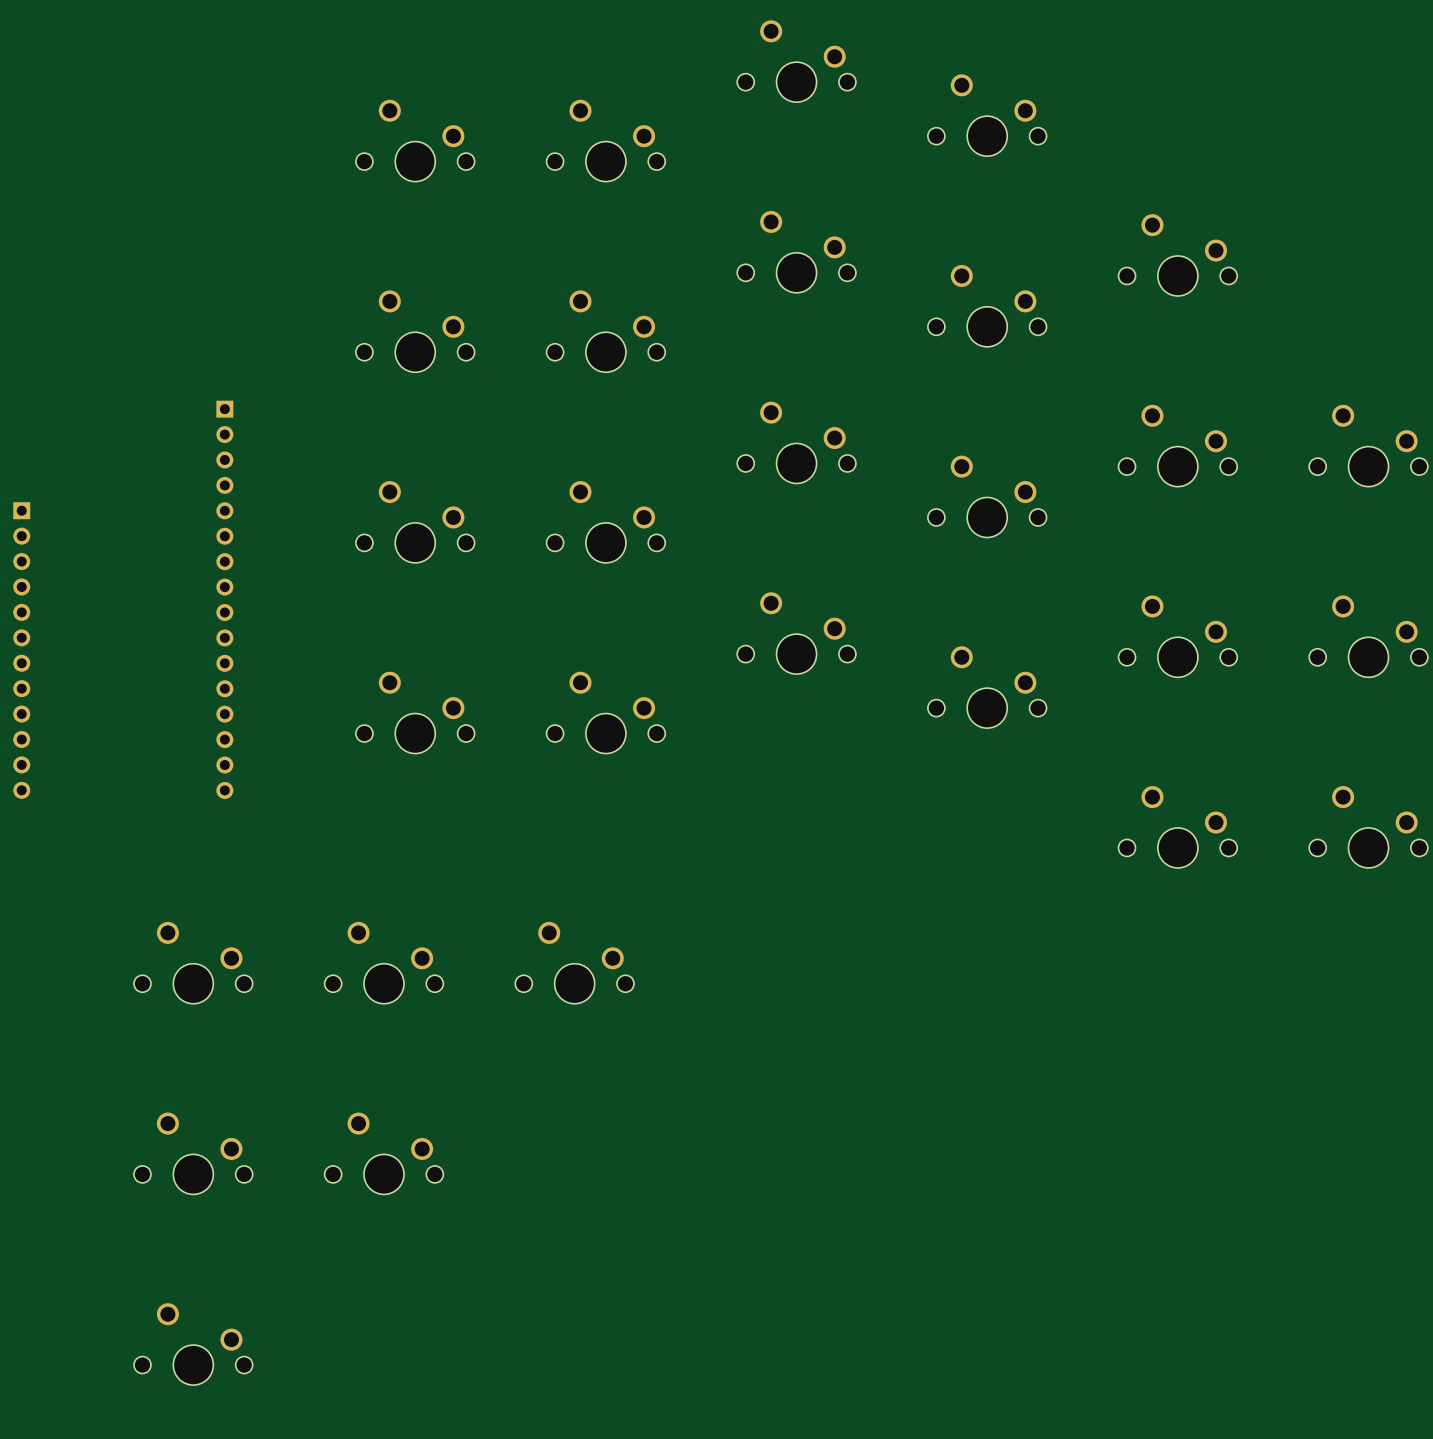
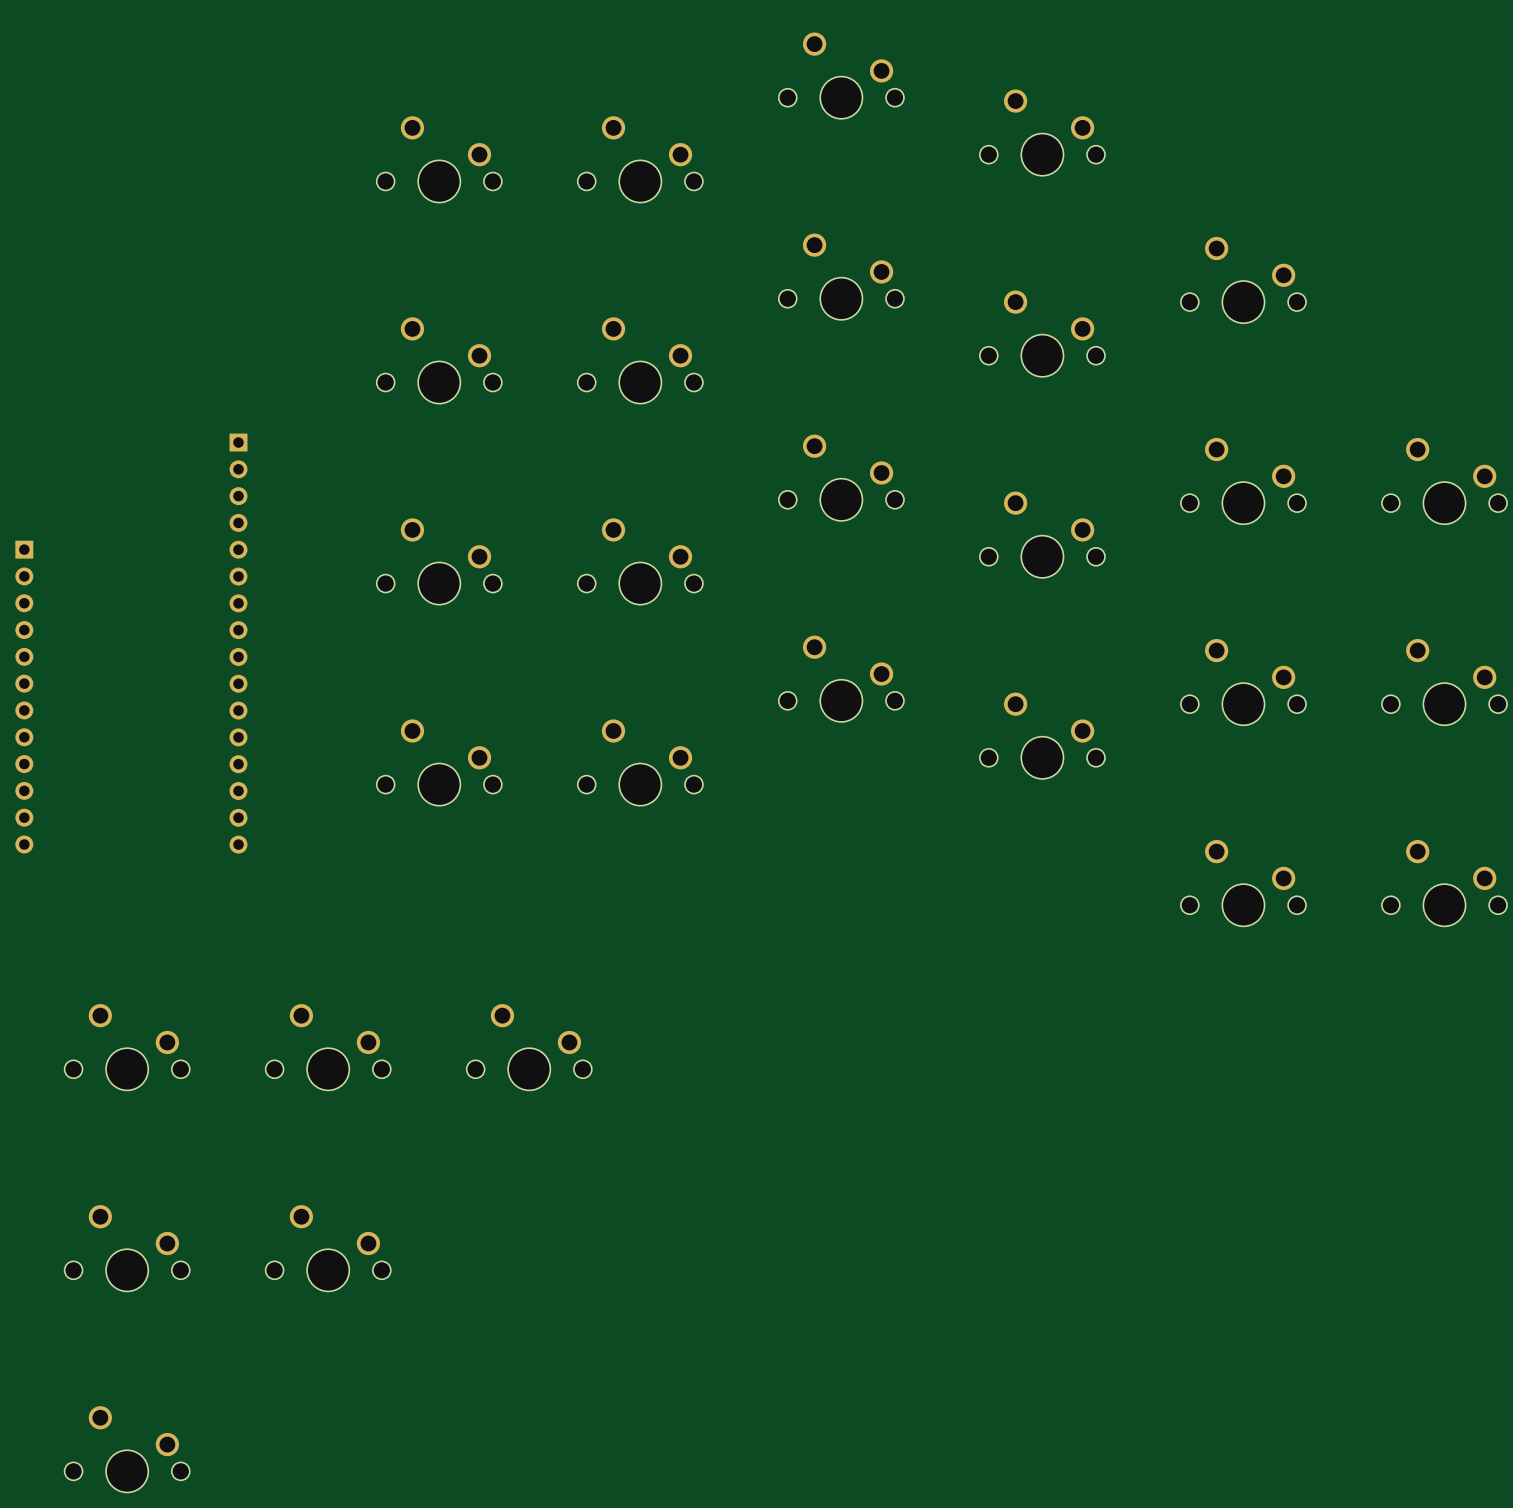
part: (193, 962) -> none
part: (383, 962) -> none
part: (574, 962) -> none
part: none -> (127, 1047)
part: none -> (328, 1047)
part: none -> (529, 1047)
part: (193, 1153) -> none
part: (383, 1153) -> none
part: none -> (127, 1248)
part: none -> (328, 1248)
part position: (193, 1344) -> (127, 1449)

